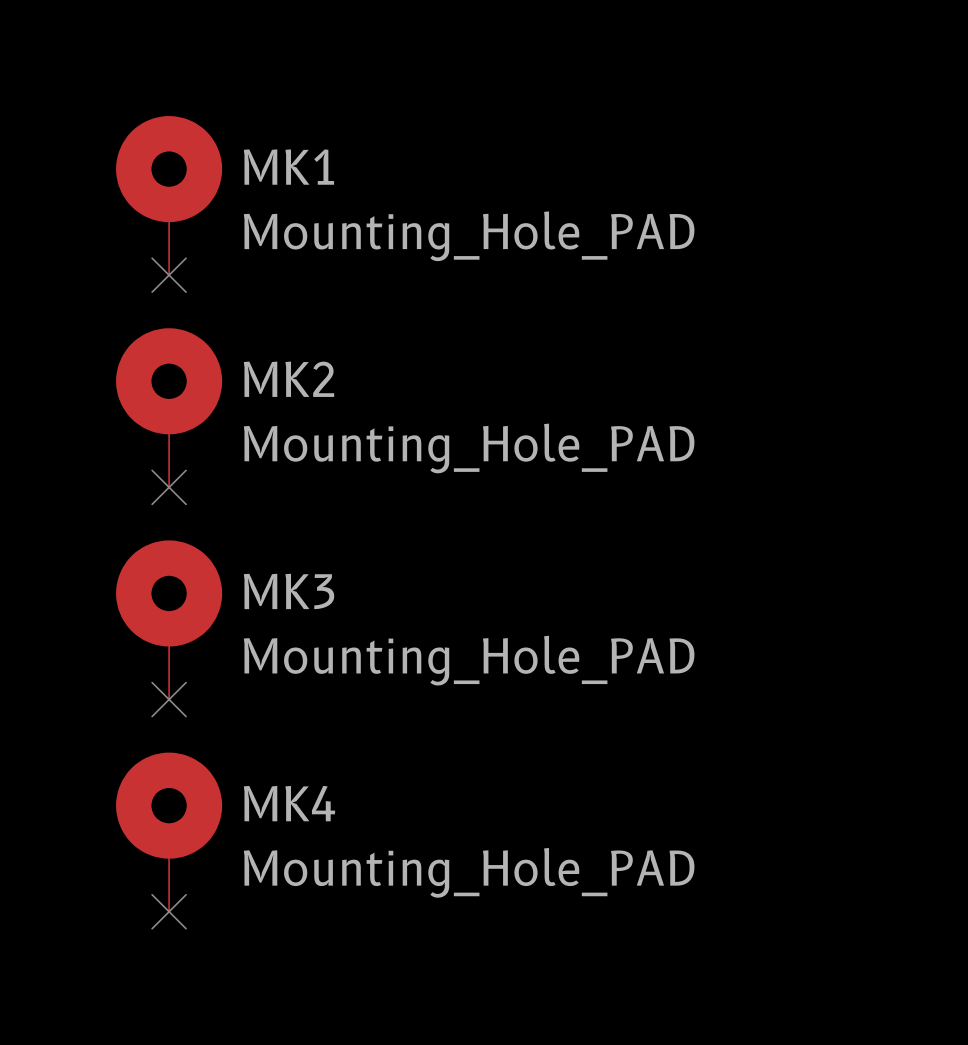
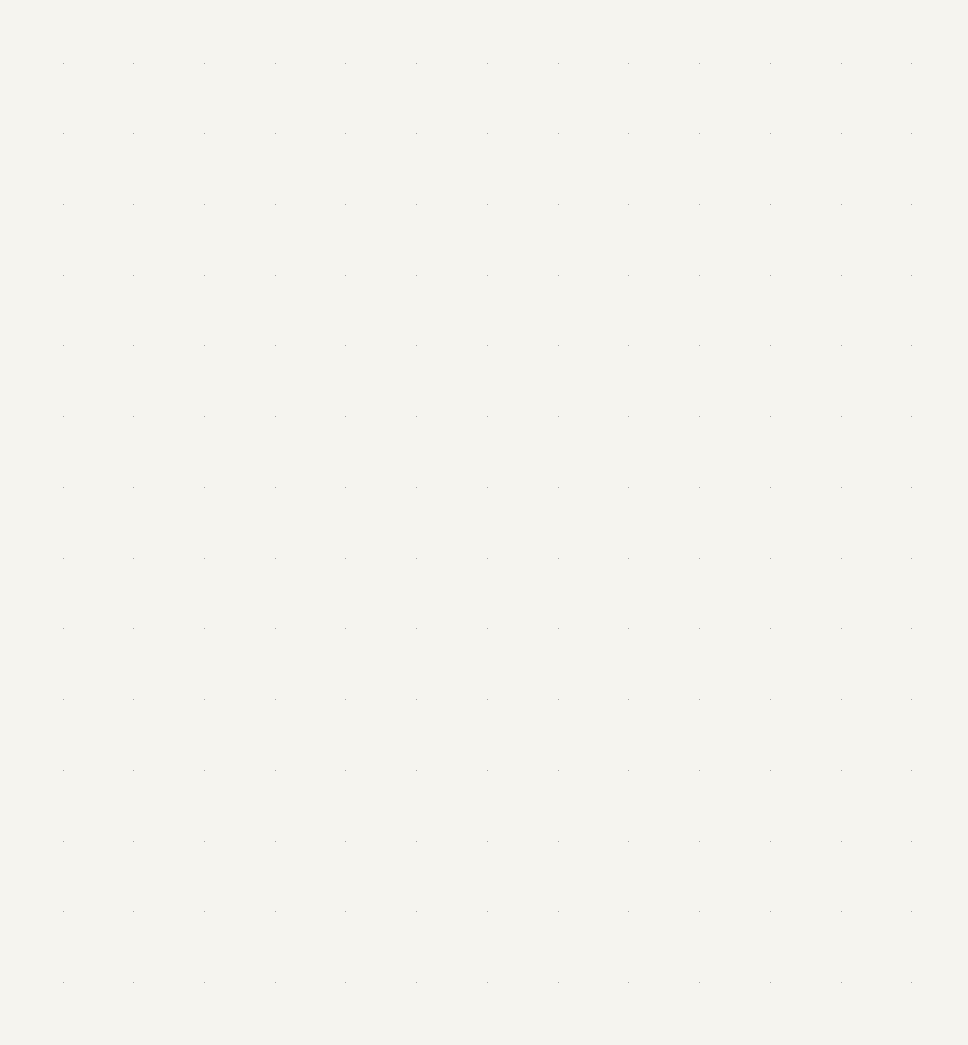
MK1: Mounting_Hole_PAD (169, 195) -> none
no-connect mark: (169, 275) -> none
MK2: Mounting_Hole_PAD (169, 407) -> none
no-connect mark: (169, 487) -> none
MK3: Mounting_Hole_PAD (169, 619) -> none
no-connect mark: (169, 699) -> none
MK4: Mounting_Hole_PAD (169, 832) -> none
no-connect mark: (169, 911) -> none

